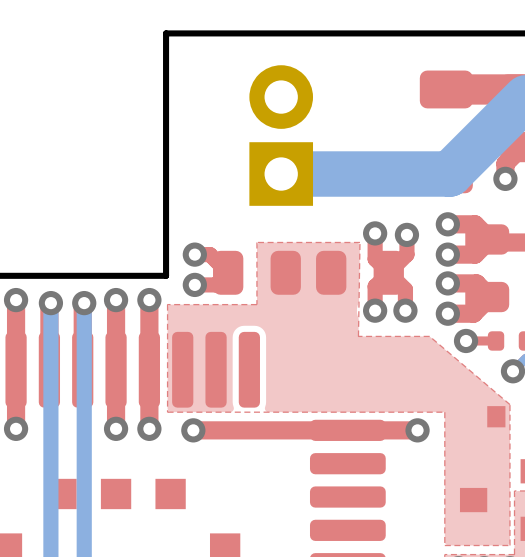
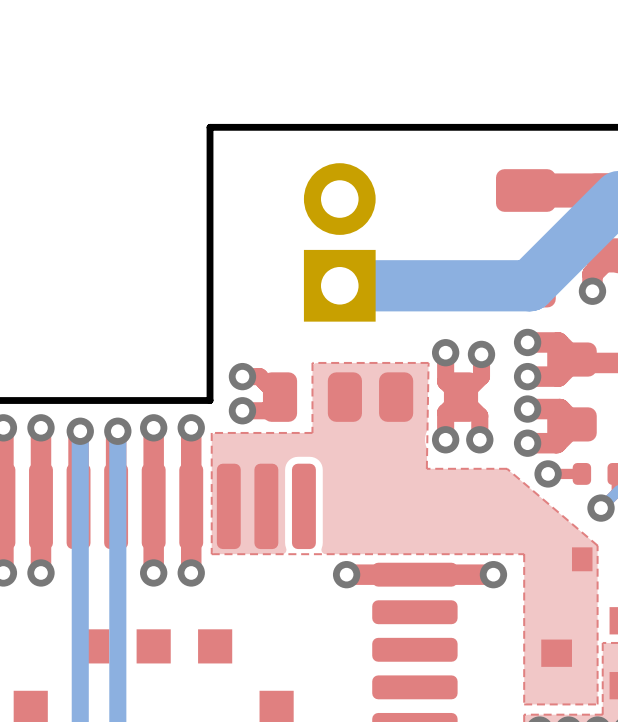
via position: (193, 430) -> (346, 574)
top track: (287, 430) (193, 430) -> none

